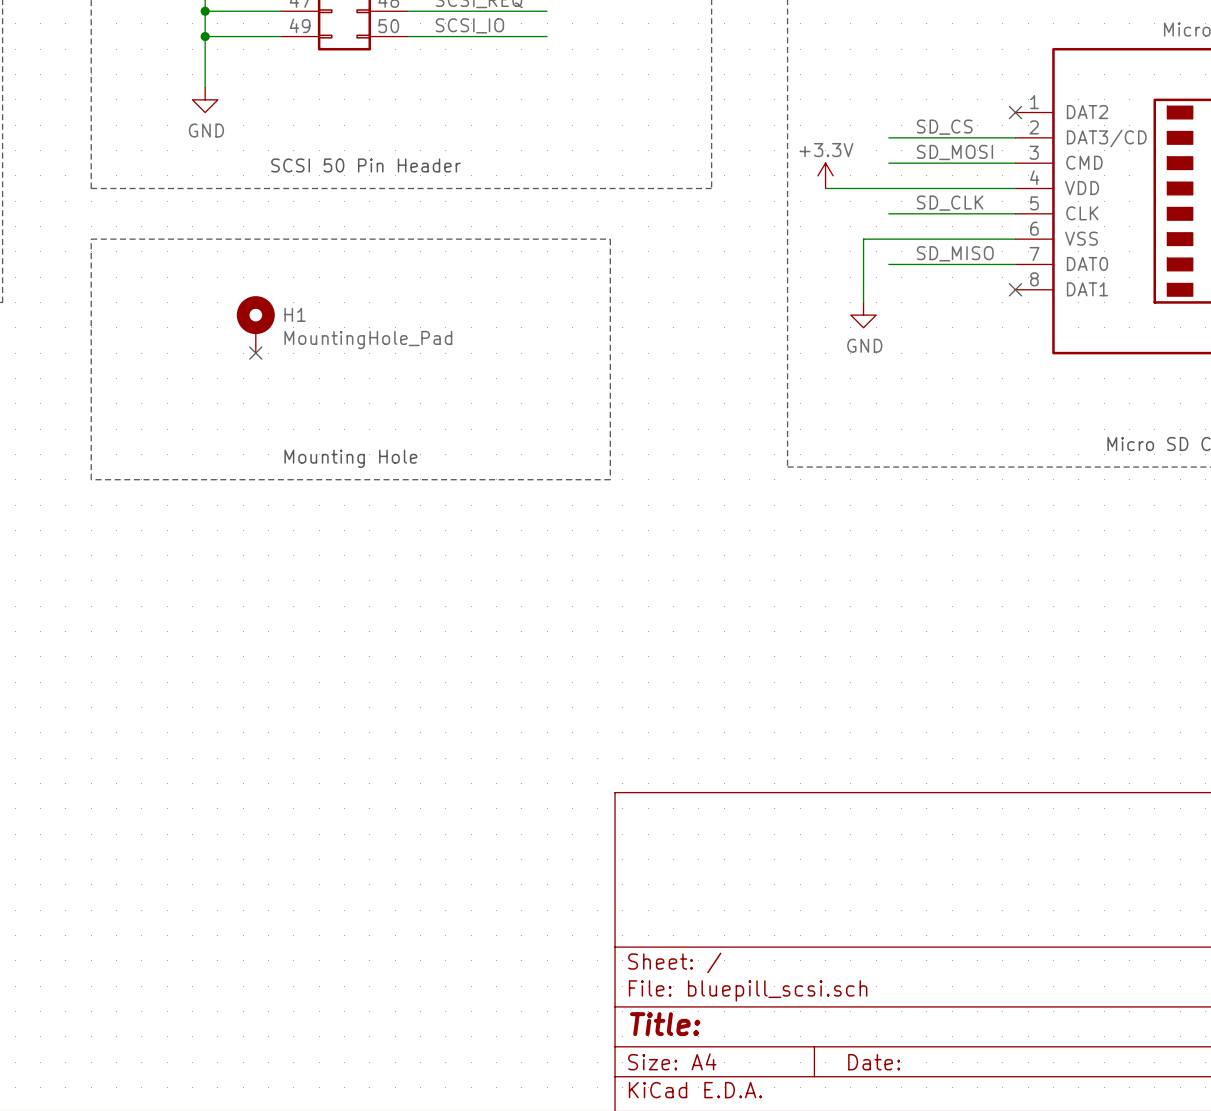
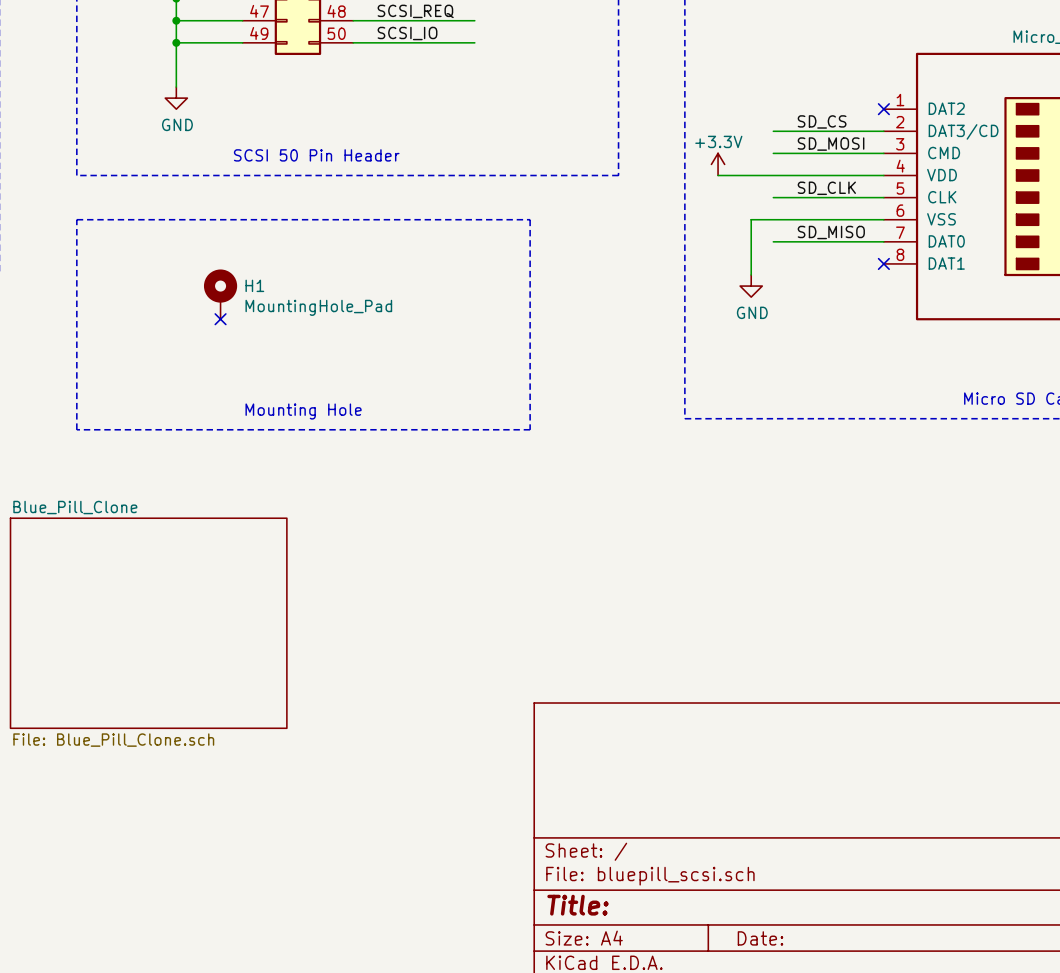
sheet Blue_Pill_Clone: none -> File: Blue_Pill_Clone.sch (148, 623)

